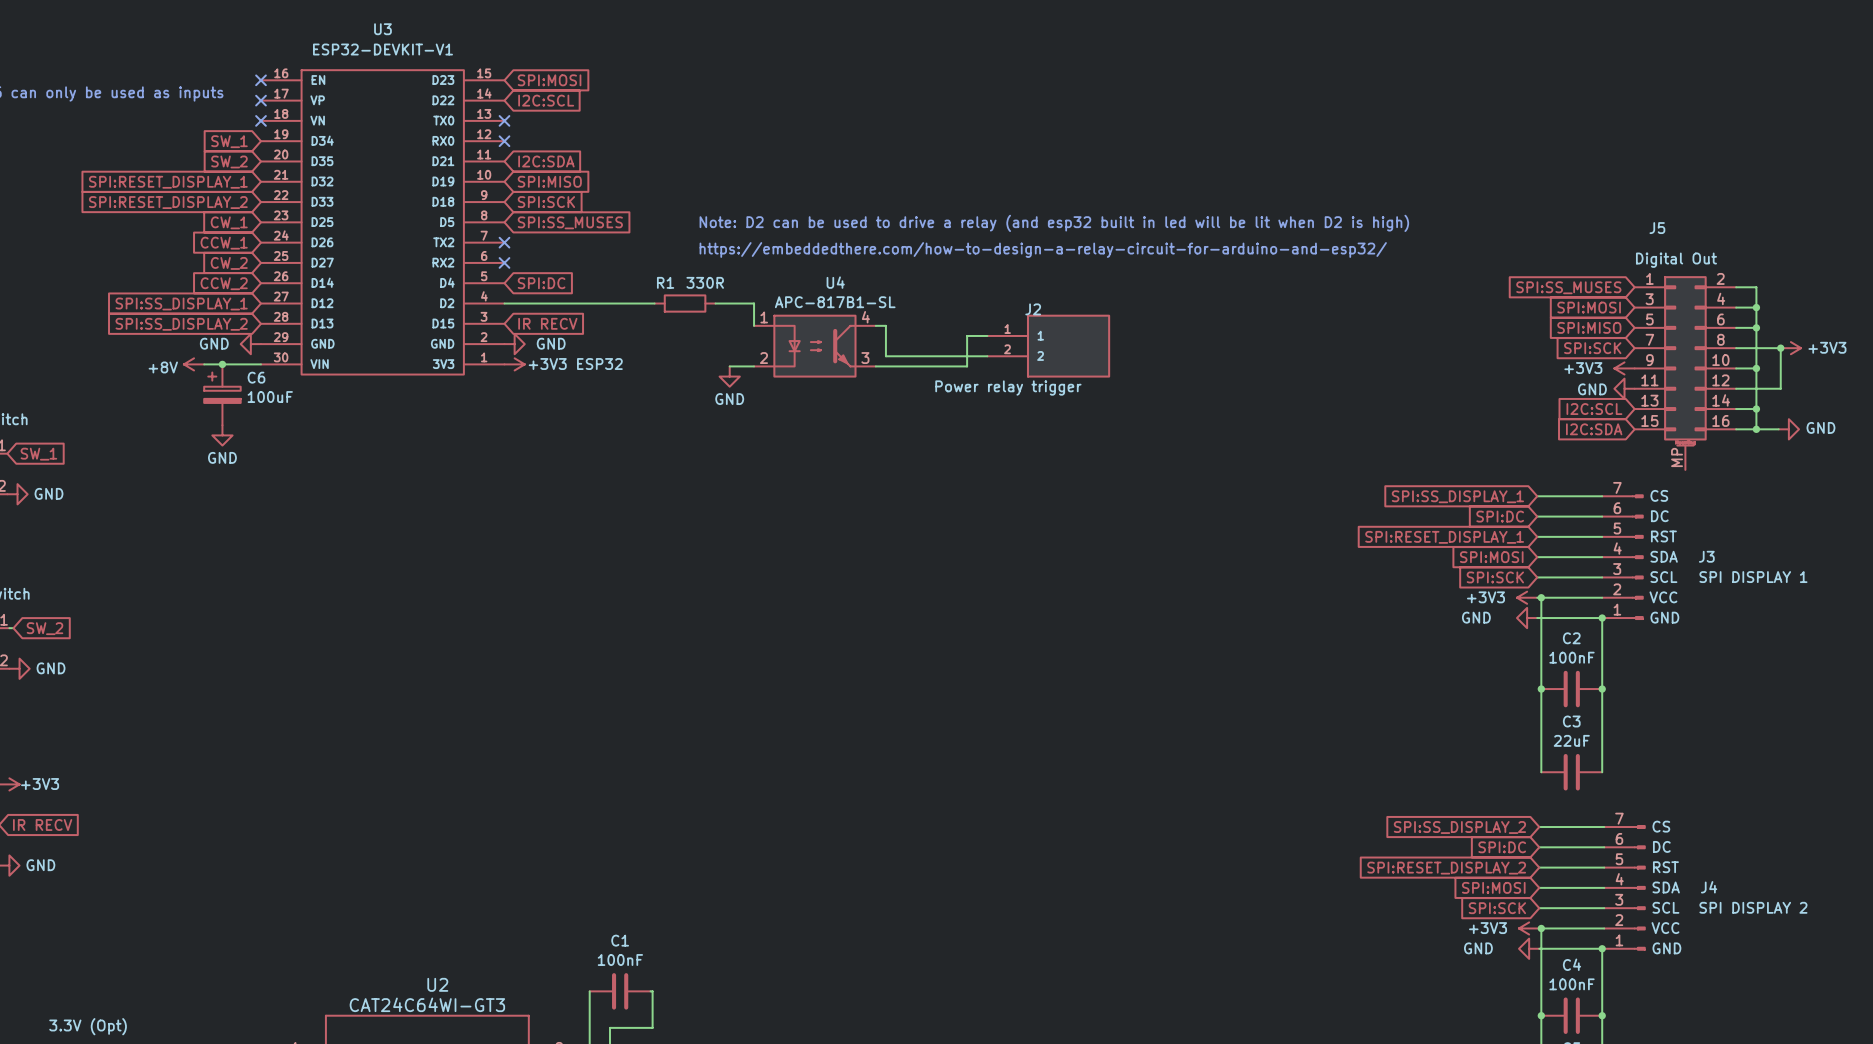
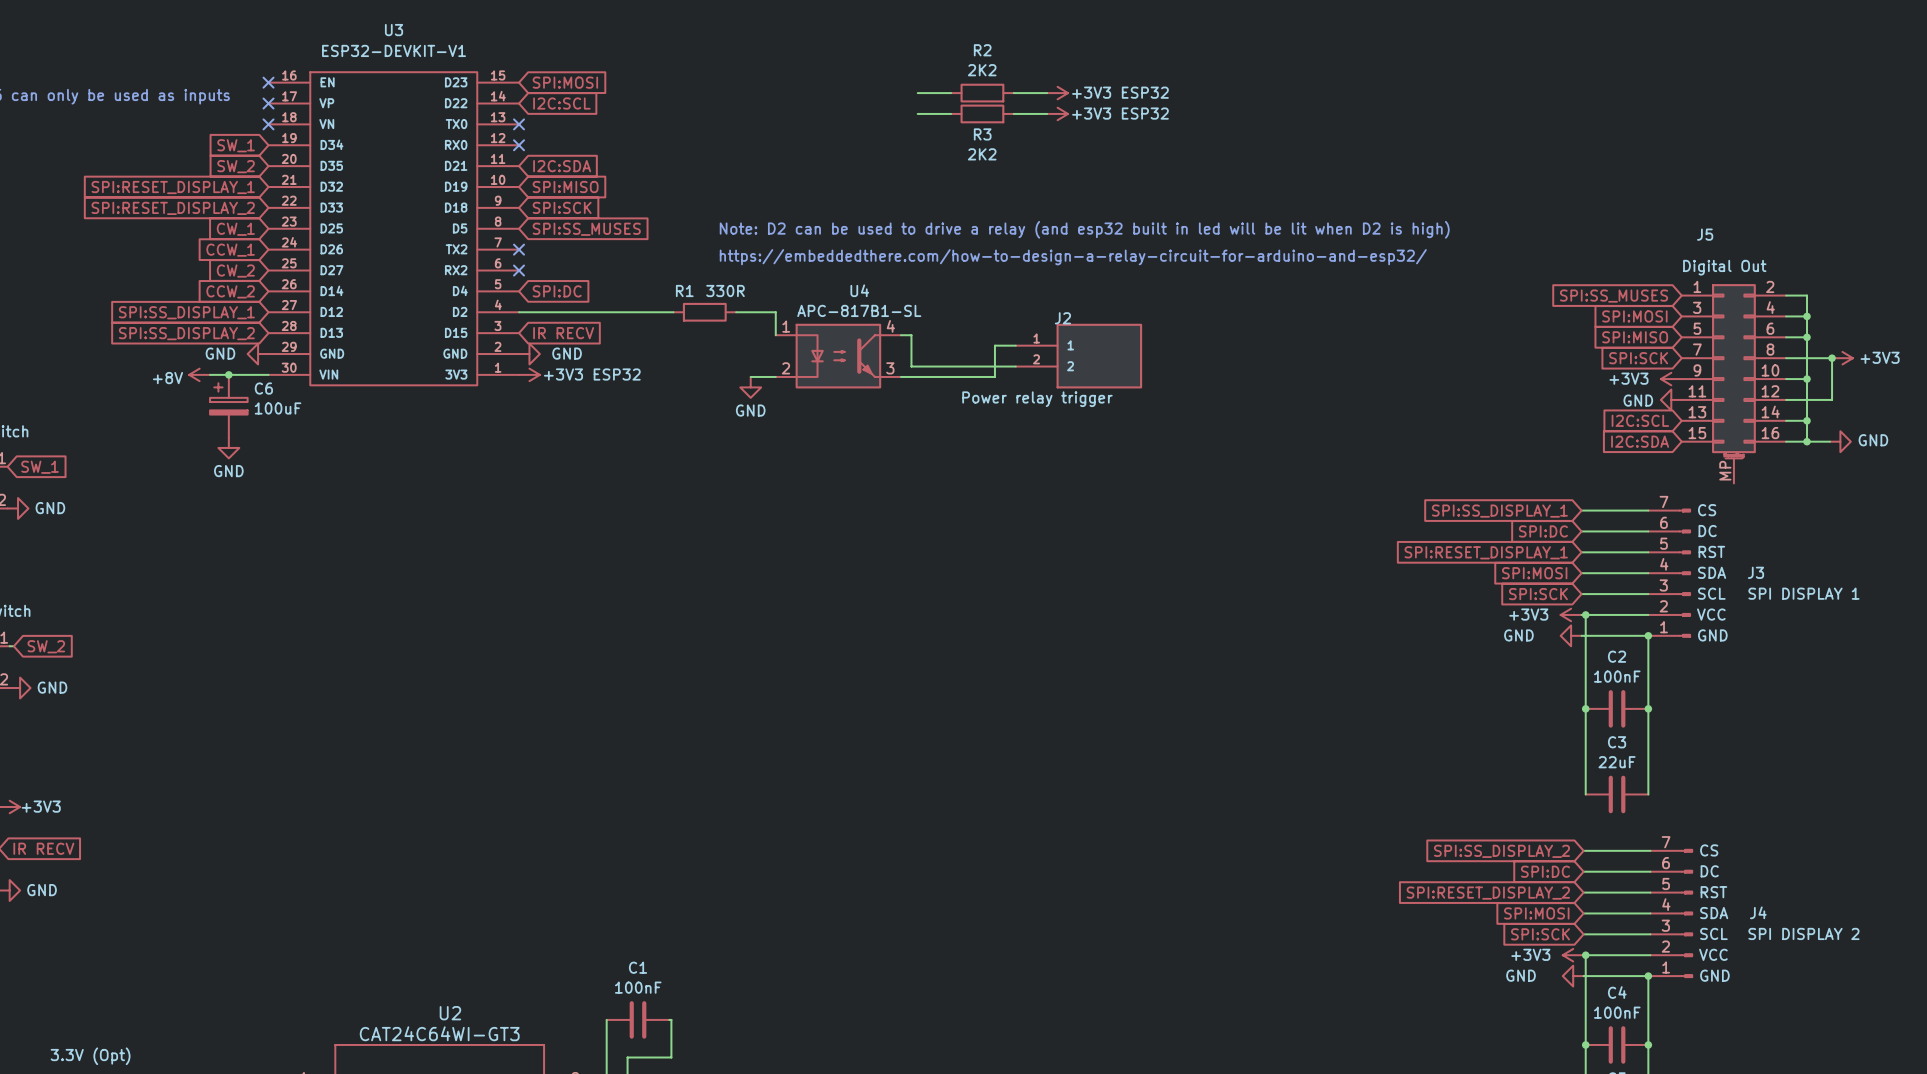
wire: none -> (917, 93) (951, 93)
R2: none -> 2K2 (982, 93)
wire: none -> (1013, 93) (1047, 93)
power symbol: none -> +3V3 ESP32 (1057, 93)
wire: none -> (917, 113) (951, 113)
R3: none -> 2K2 (982, 113)
wire: none -> (1013, 113) (1047, 113)
power symbol: none -> +3V3 ESP32 (1057, 113)

